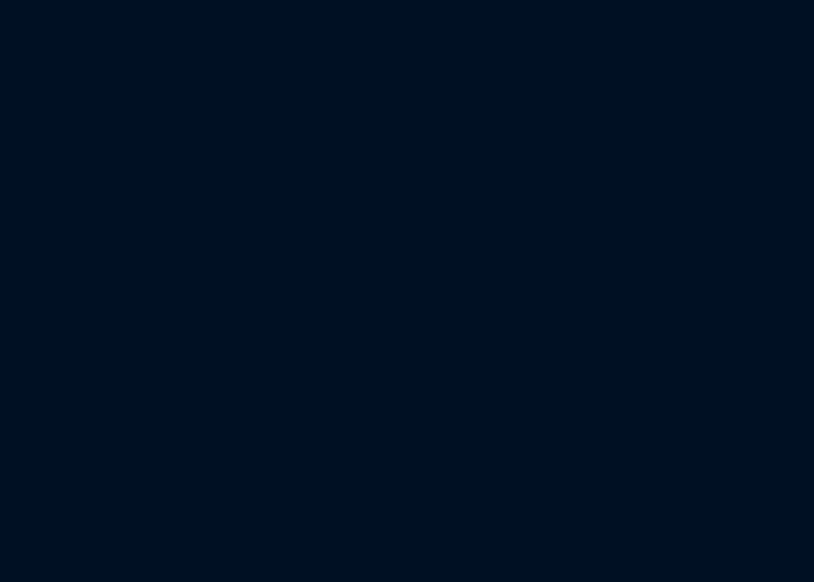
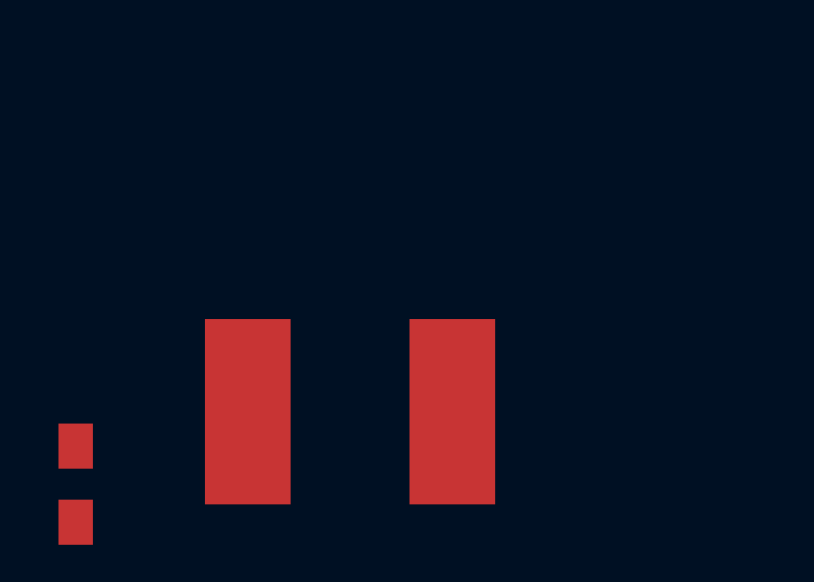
part: none -> (350, 411)
part: none -> (75, 484)

